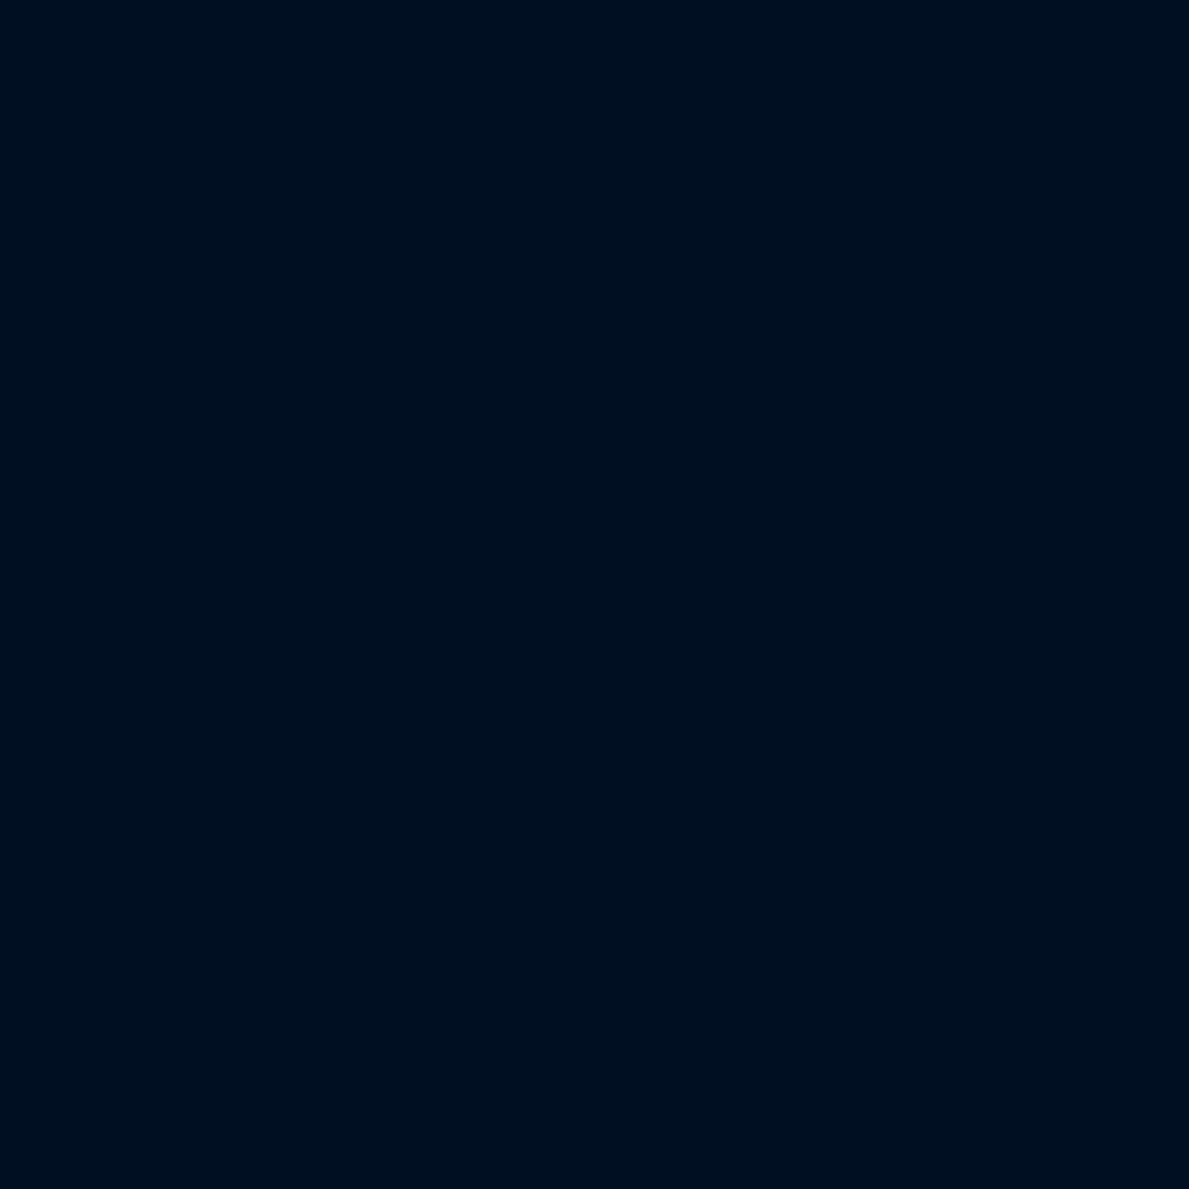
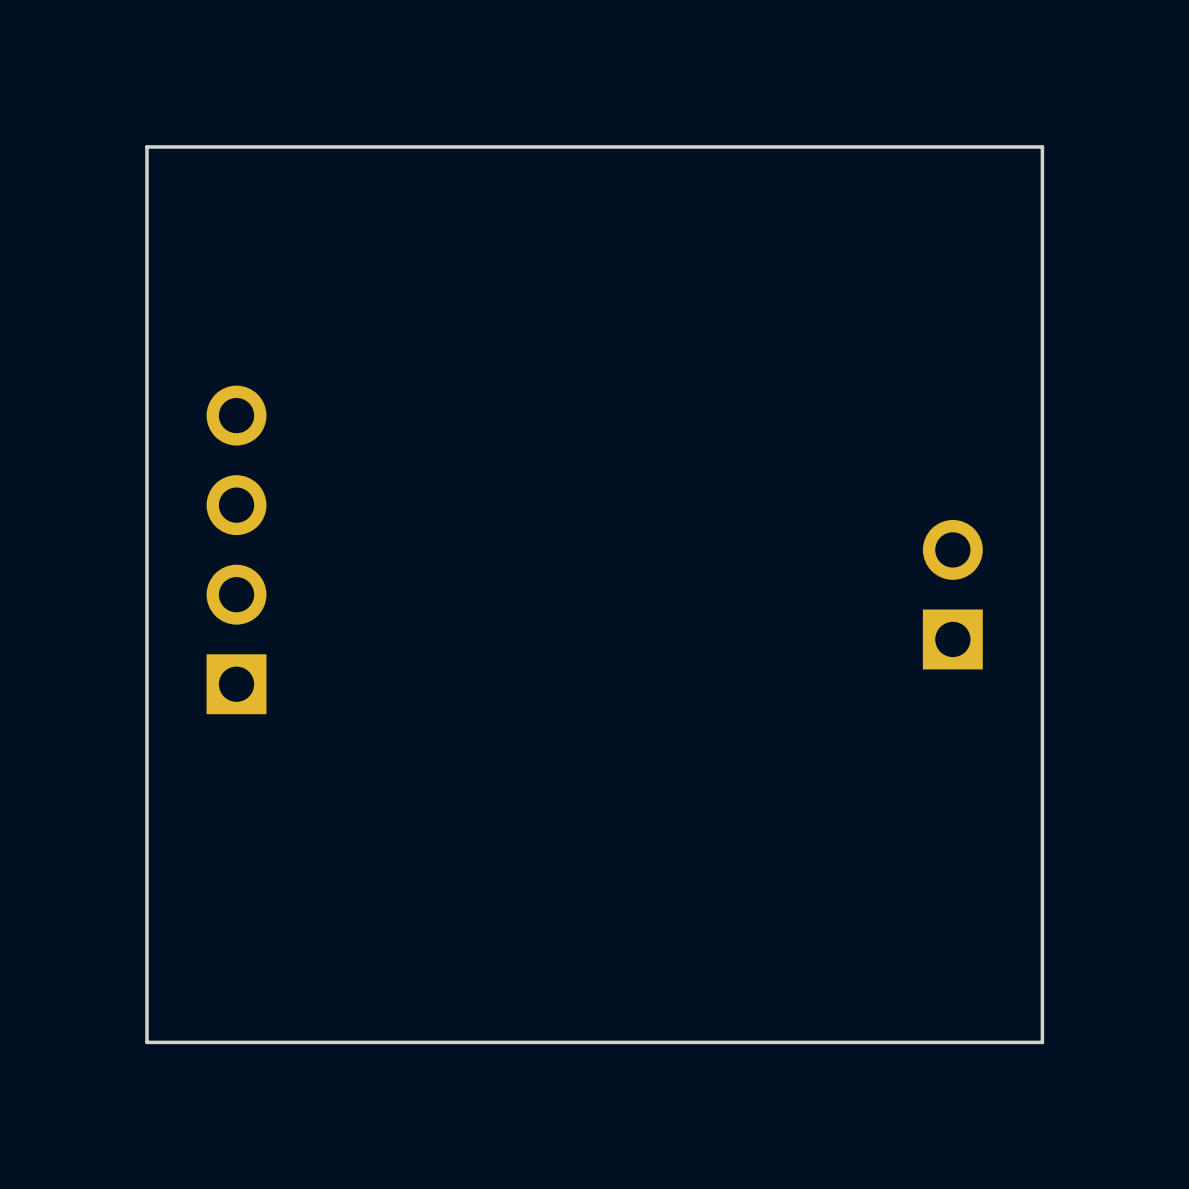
board edge: none -> (1042, 146) (146, 146) (146, 1042) (1042, 1042) (1042, 146)
part: none -> (236, 549)
part: none -> (952, 594)

